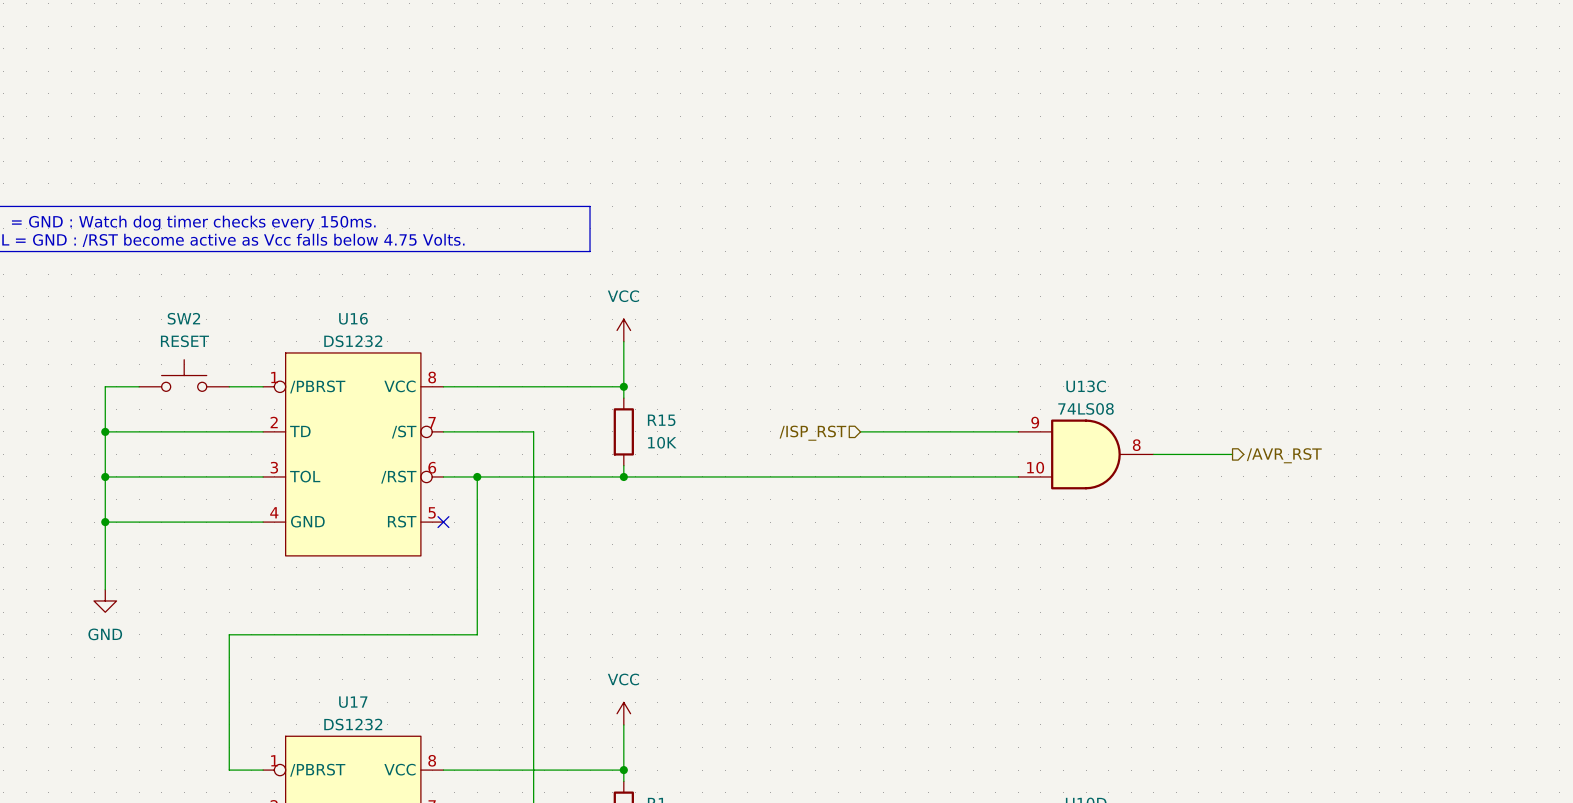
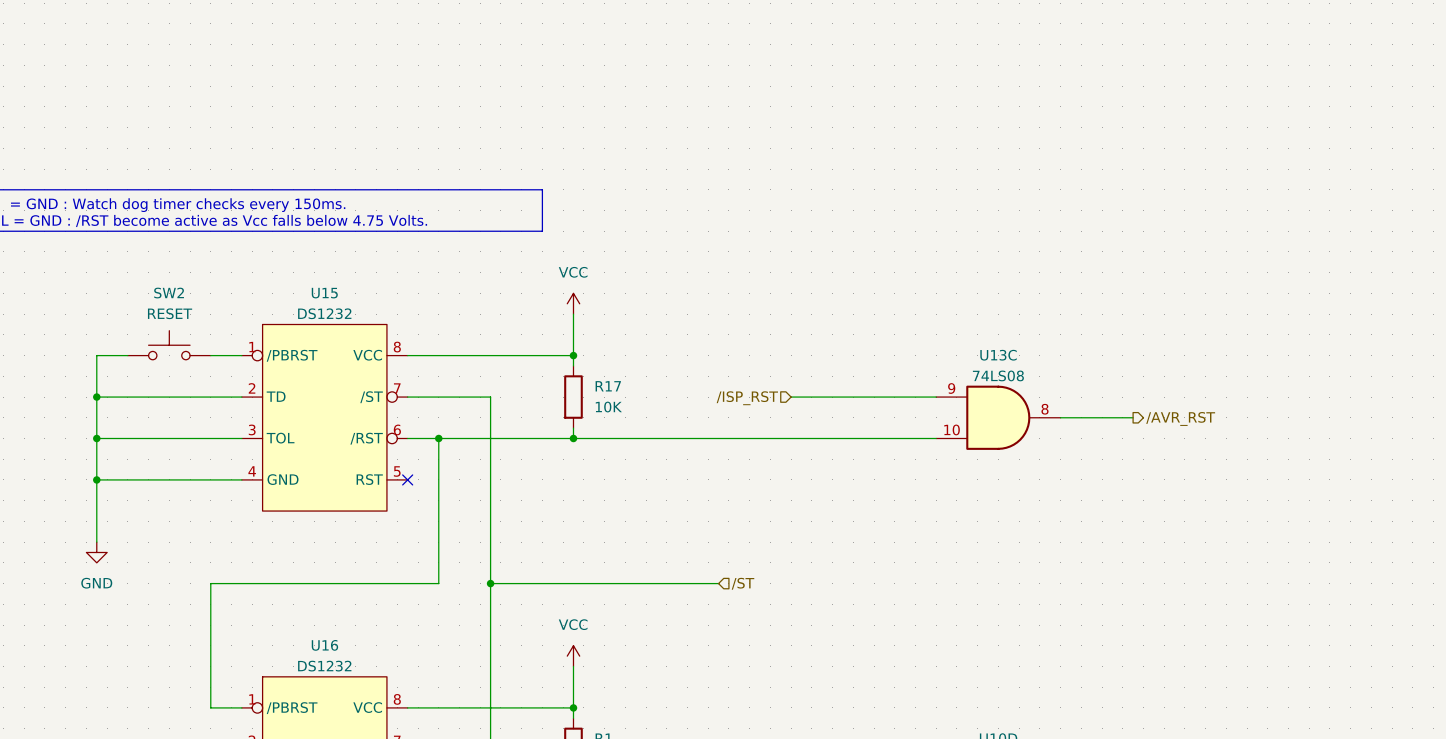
U16 name: U16 (353, 318) -> U15 (324, 293)
R15 name: R15 (661, 420) -> R17 (608, 386)
wire: none -> (490, 583) (718, 583)
junction: none -> (490, 583)
hierarchical label: none -> /ST (743, 583)
U17 name: U17 (353, 702) -> U16 (324, 645)

